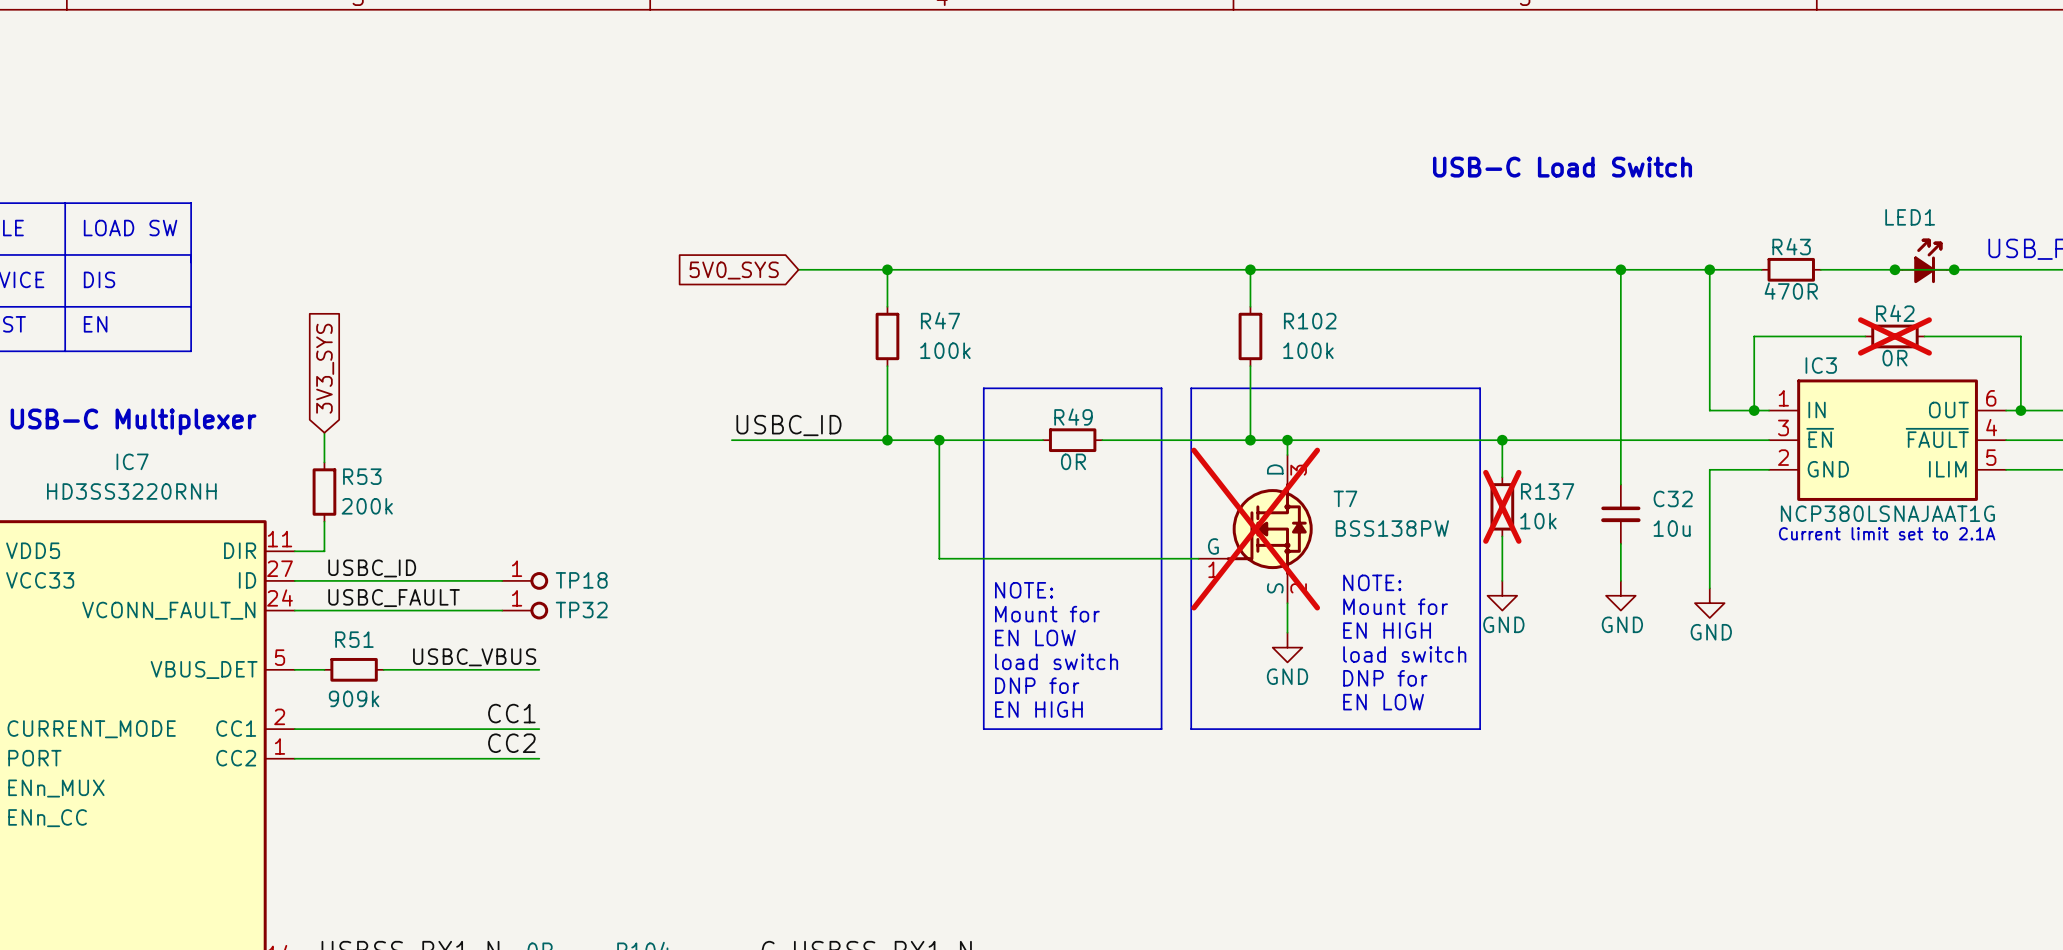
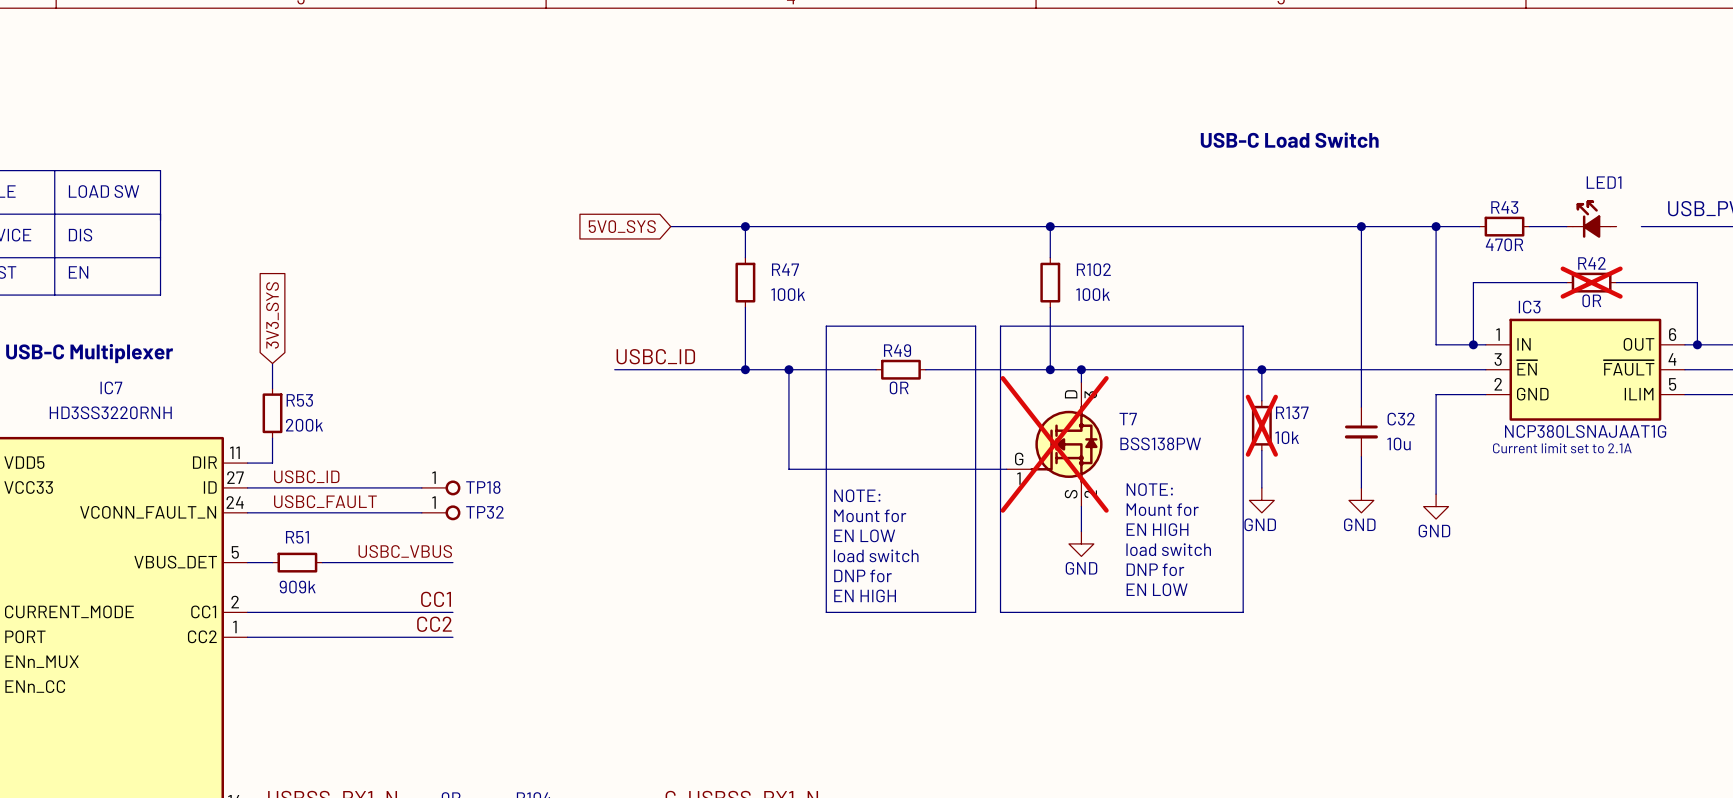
LED1 flip: as is (1924, 260) -> left-right (1591, 219)
junction: (1894, 269) -> none
junction: (1954, 269) -> none

